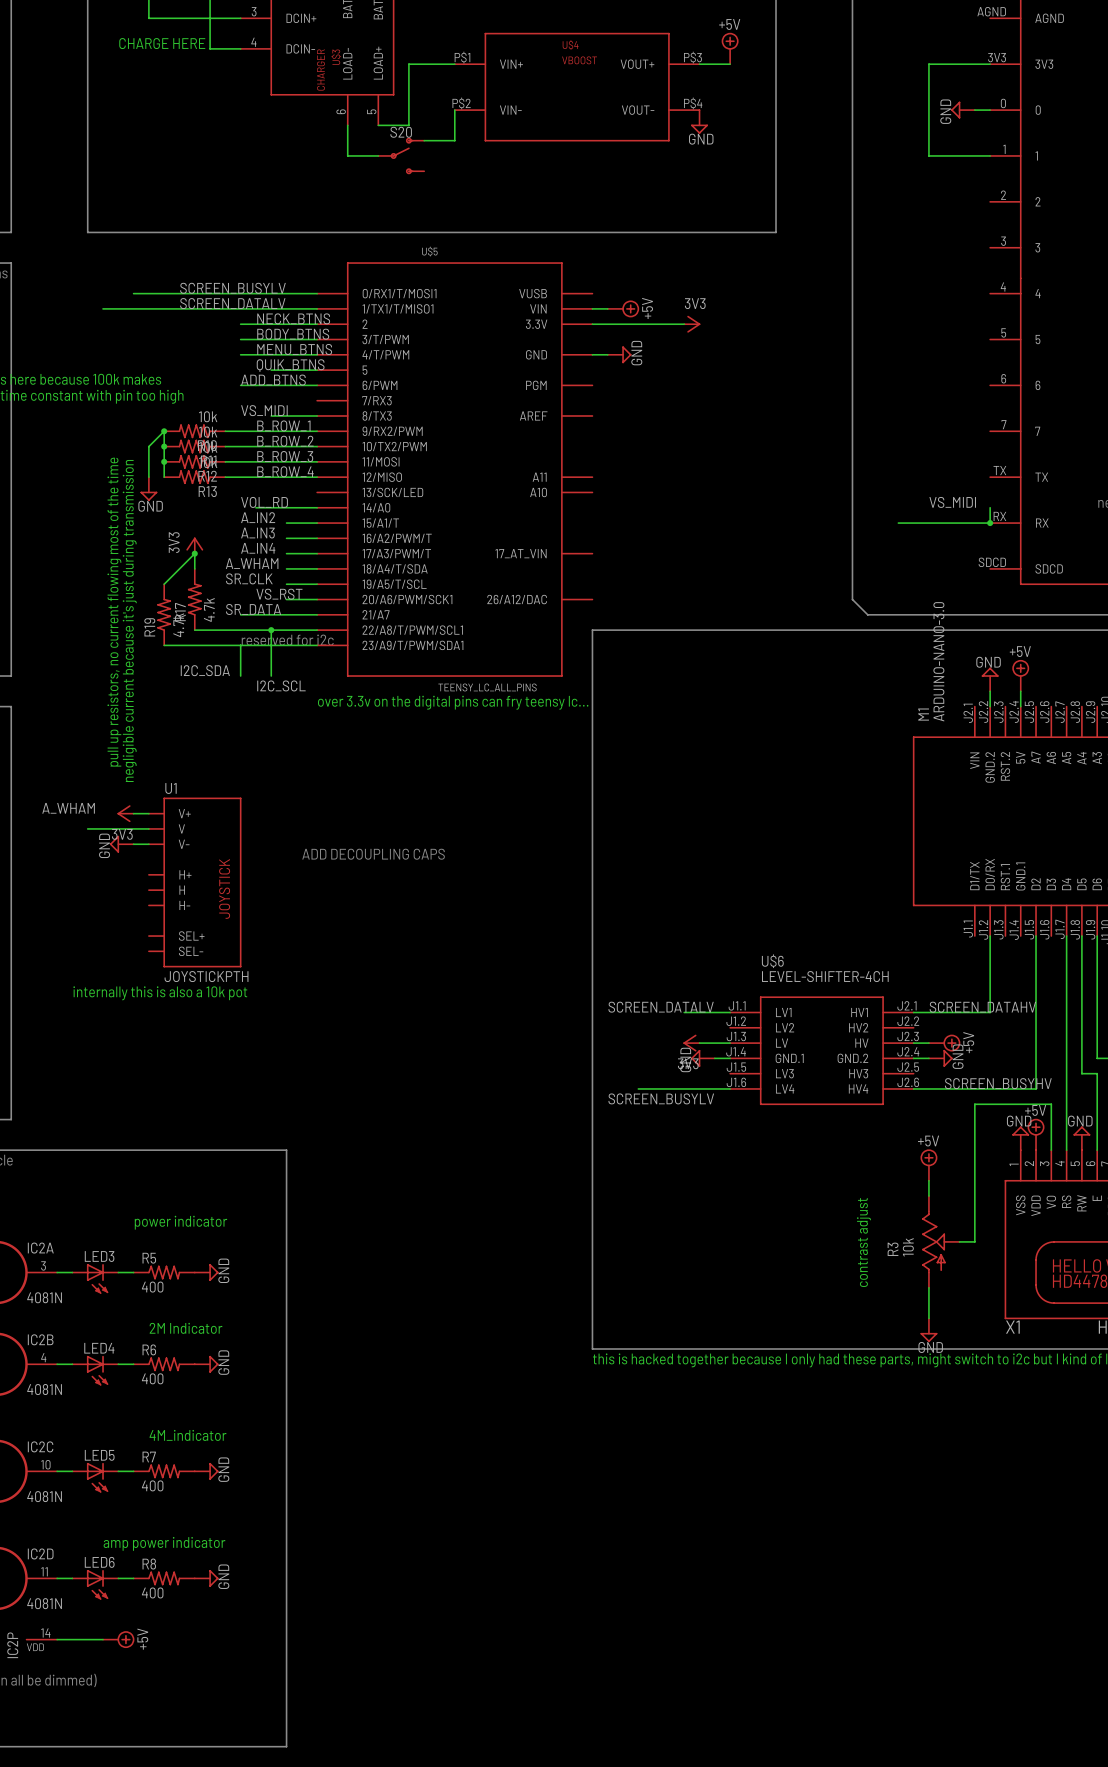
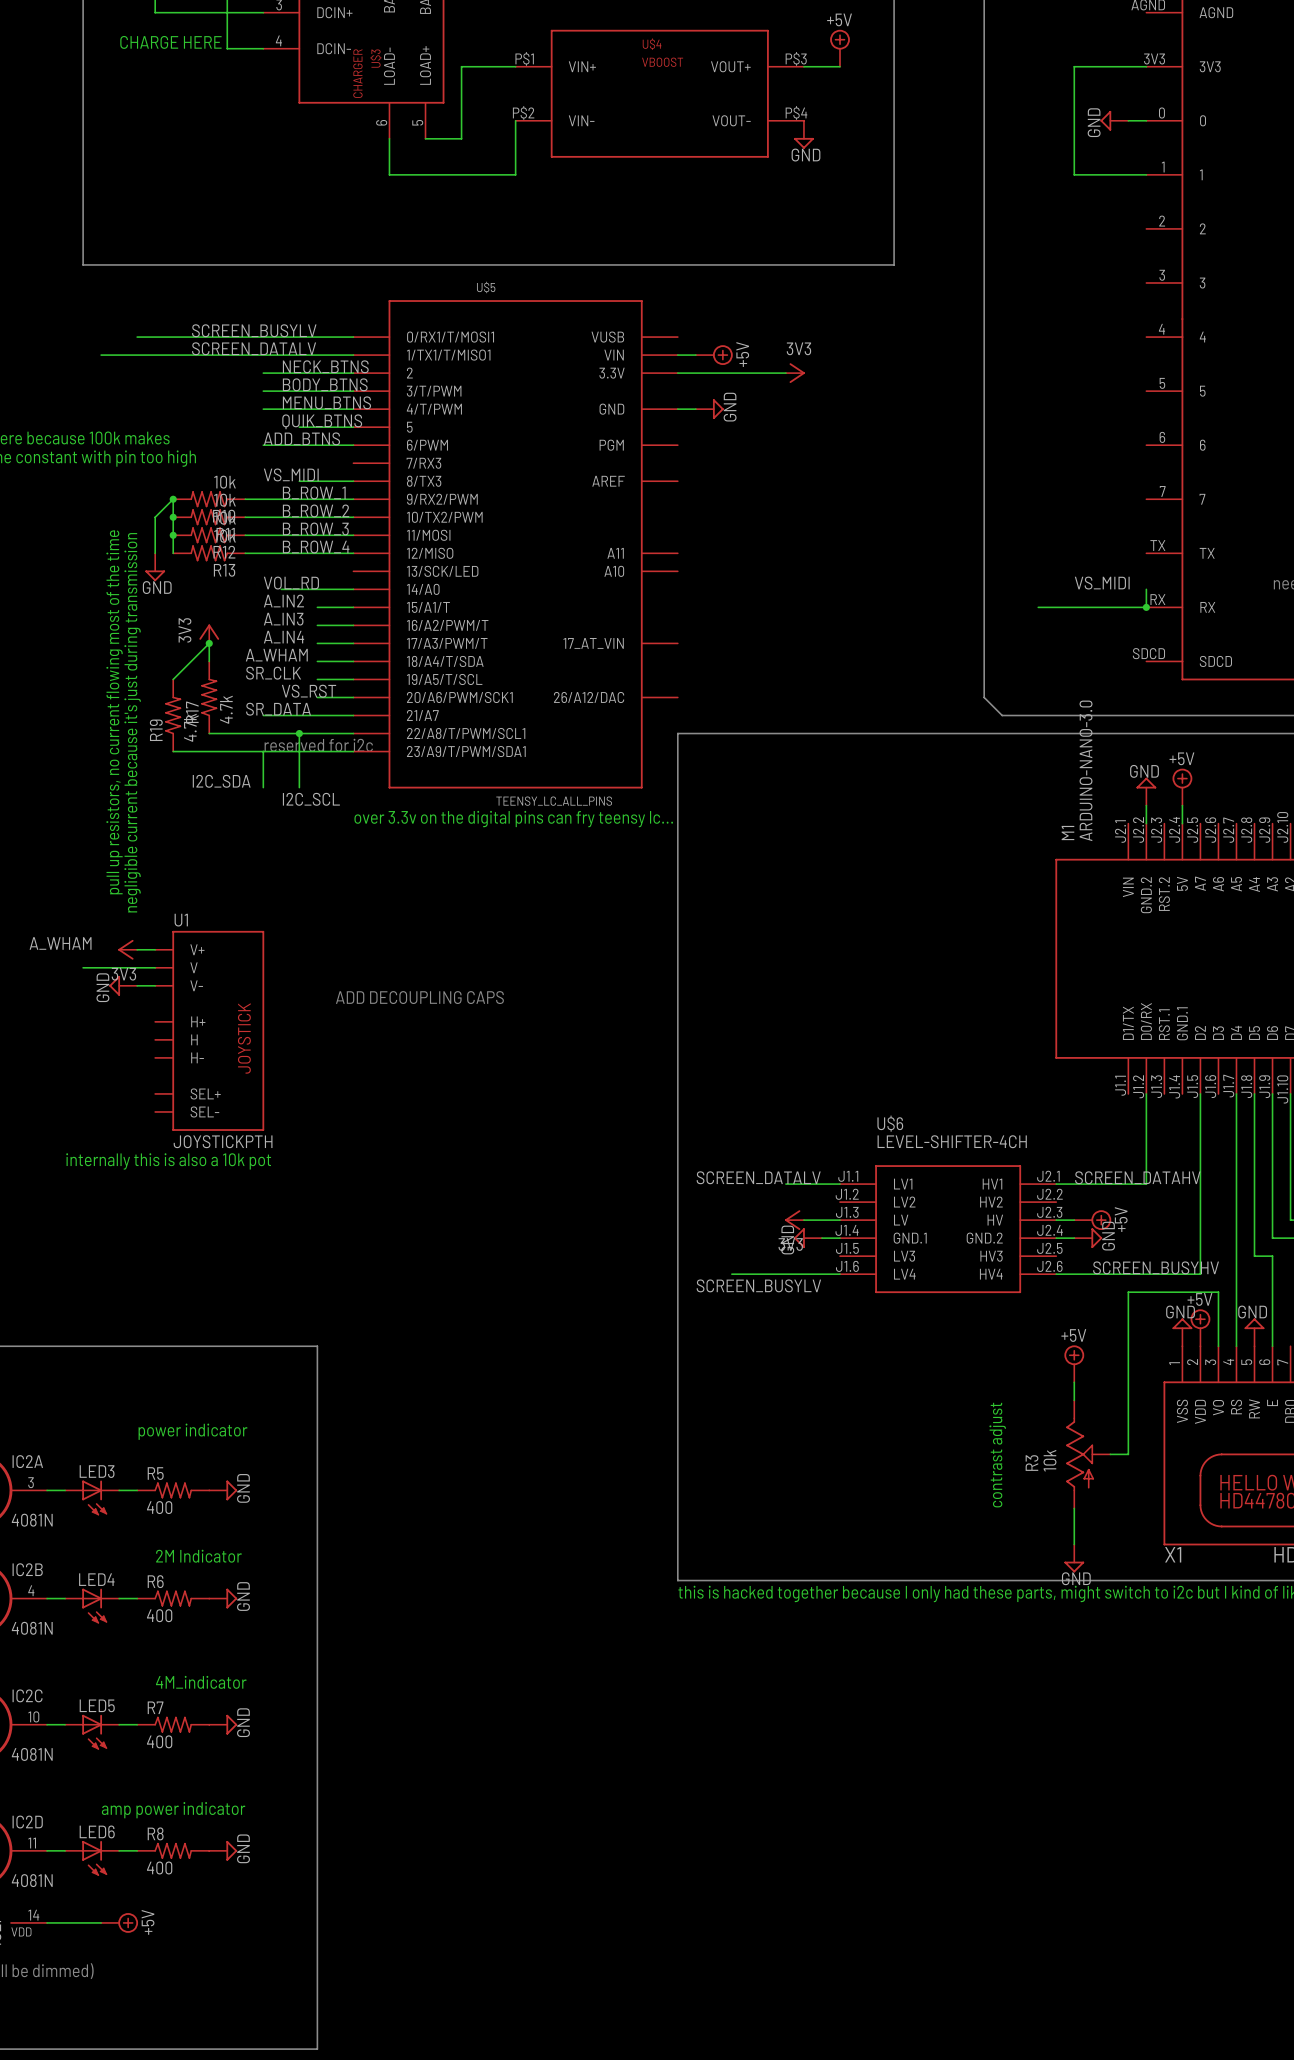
wire: (424, 140) (454, 140) -> (425, 174) (515, 174) (515, 156)
S20: (401, 155) -> none

